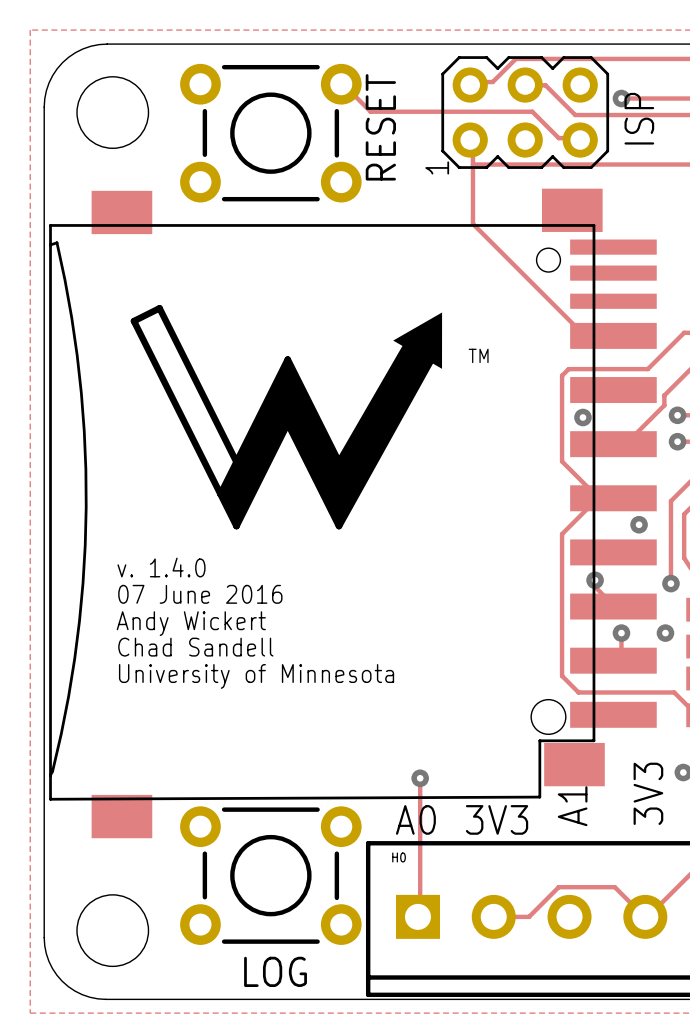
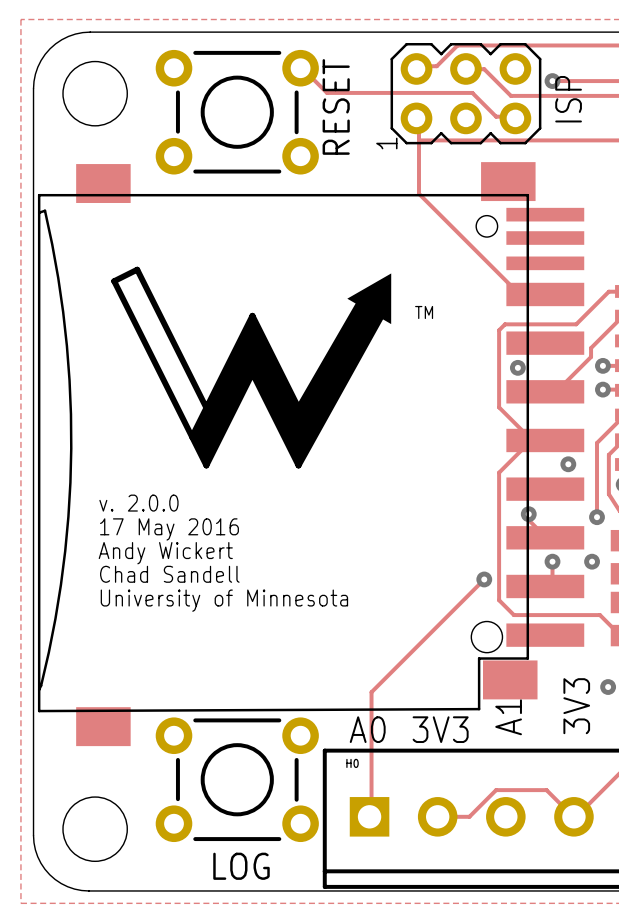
text: v. 1.4.0 (161, 567) -> v. 2.0.0 (138, 503)
text: 07 June 2016 (200, 594) -> 17 May 2016 (169, 529)
track: none -> (484, 579) (371, 692)
via: none -> (484, 579)
via: (420, 778) -> none

